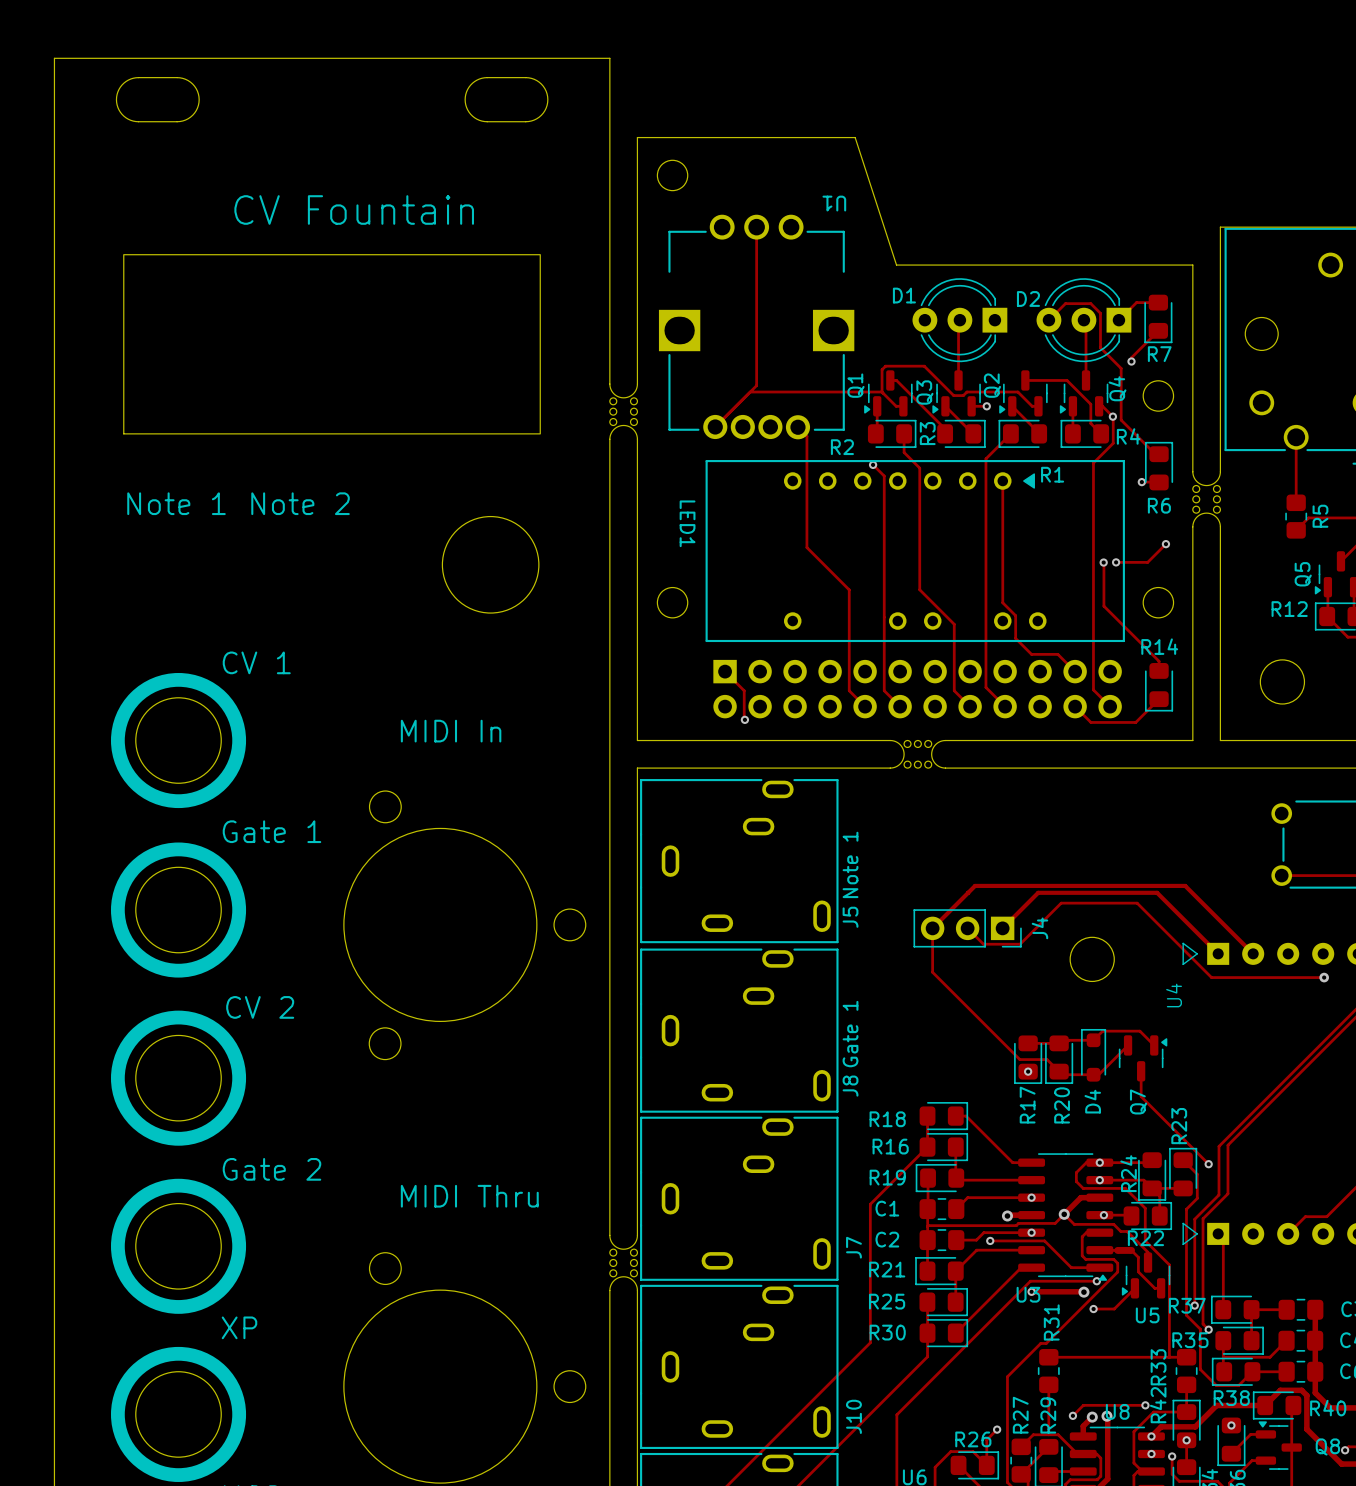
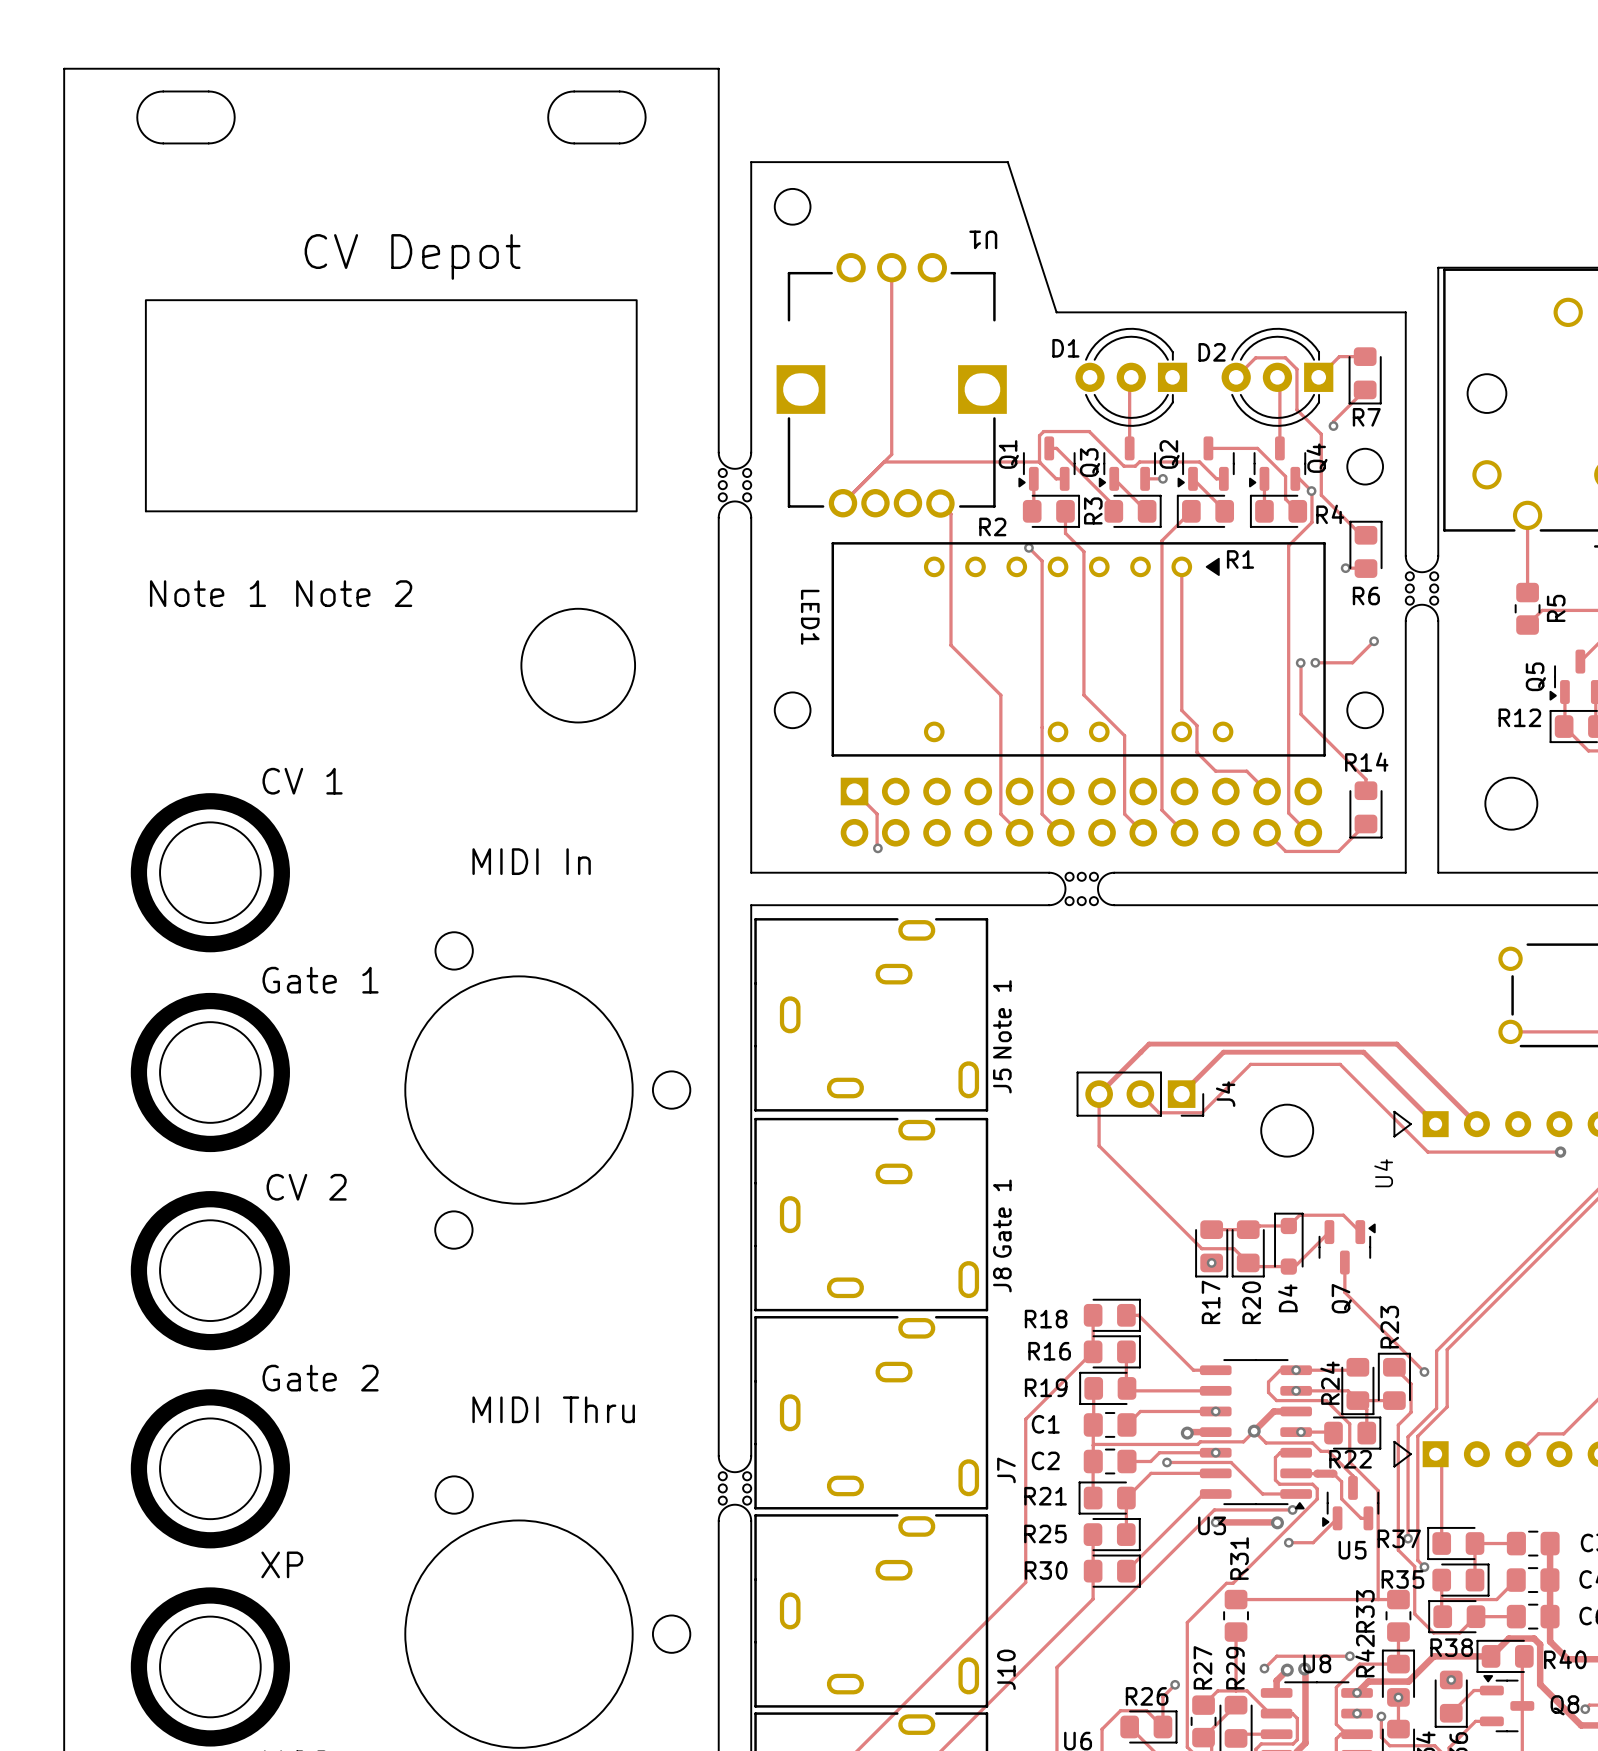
text: CV Fountain (354, 209) -> none
text: none -> CV Depot (412, 256)

